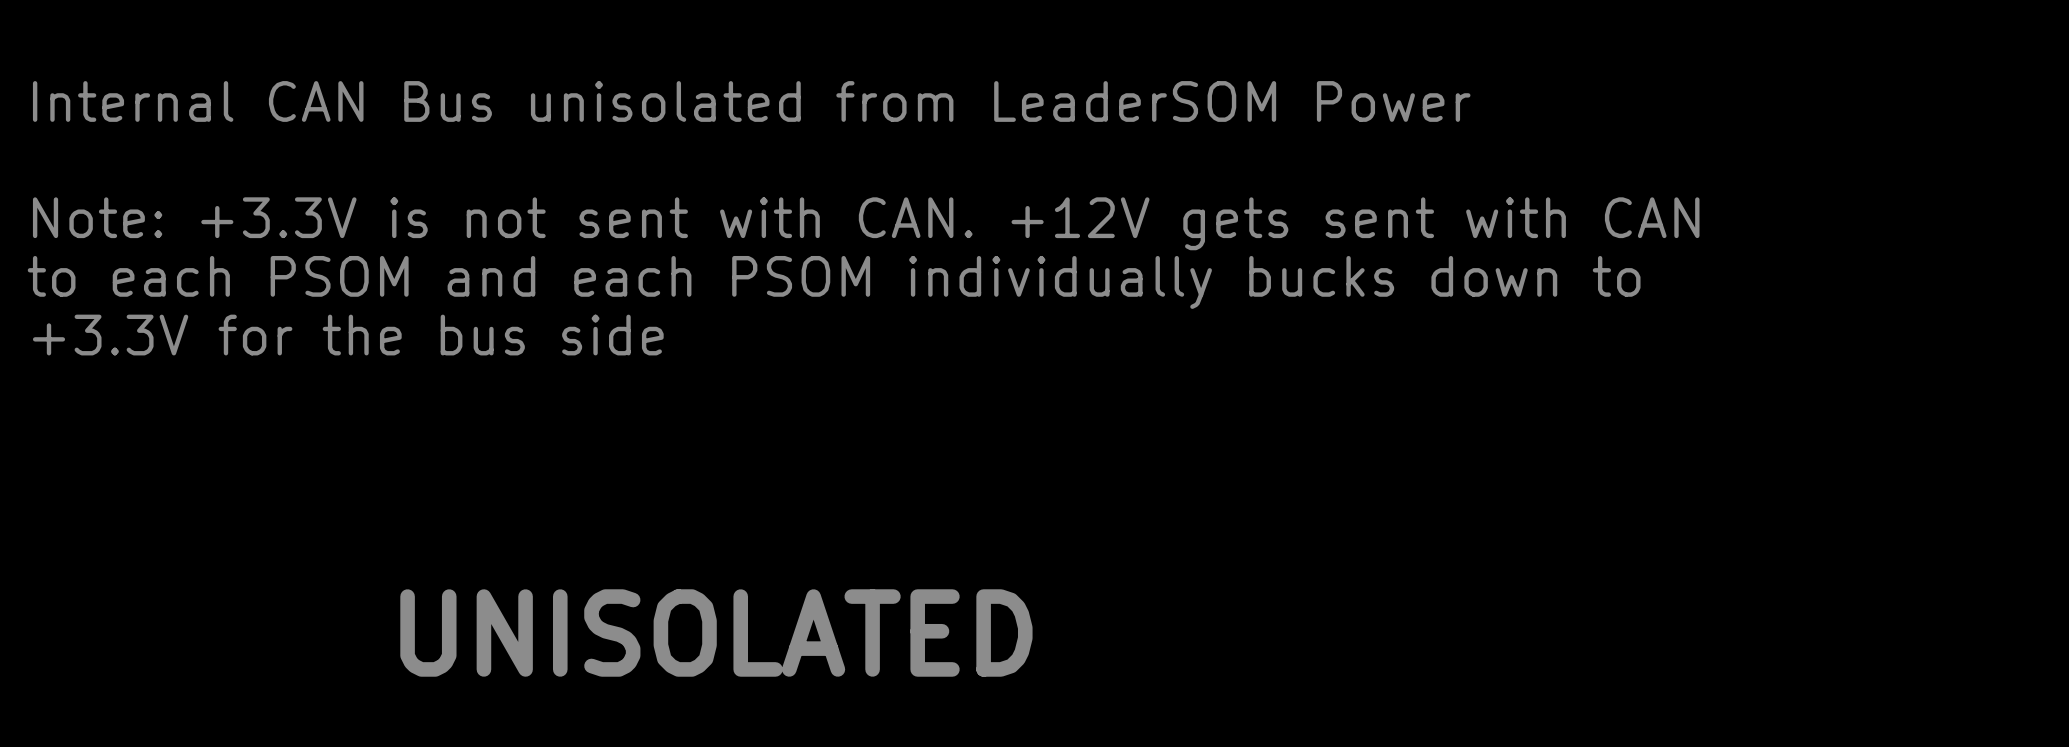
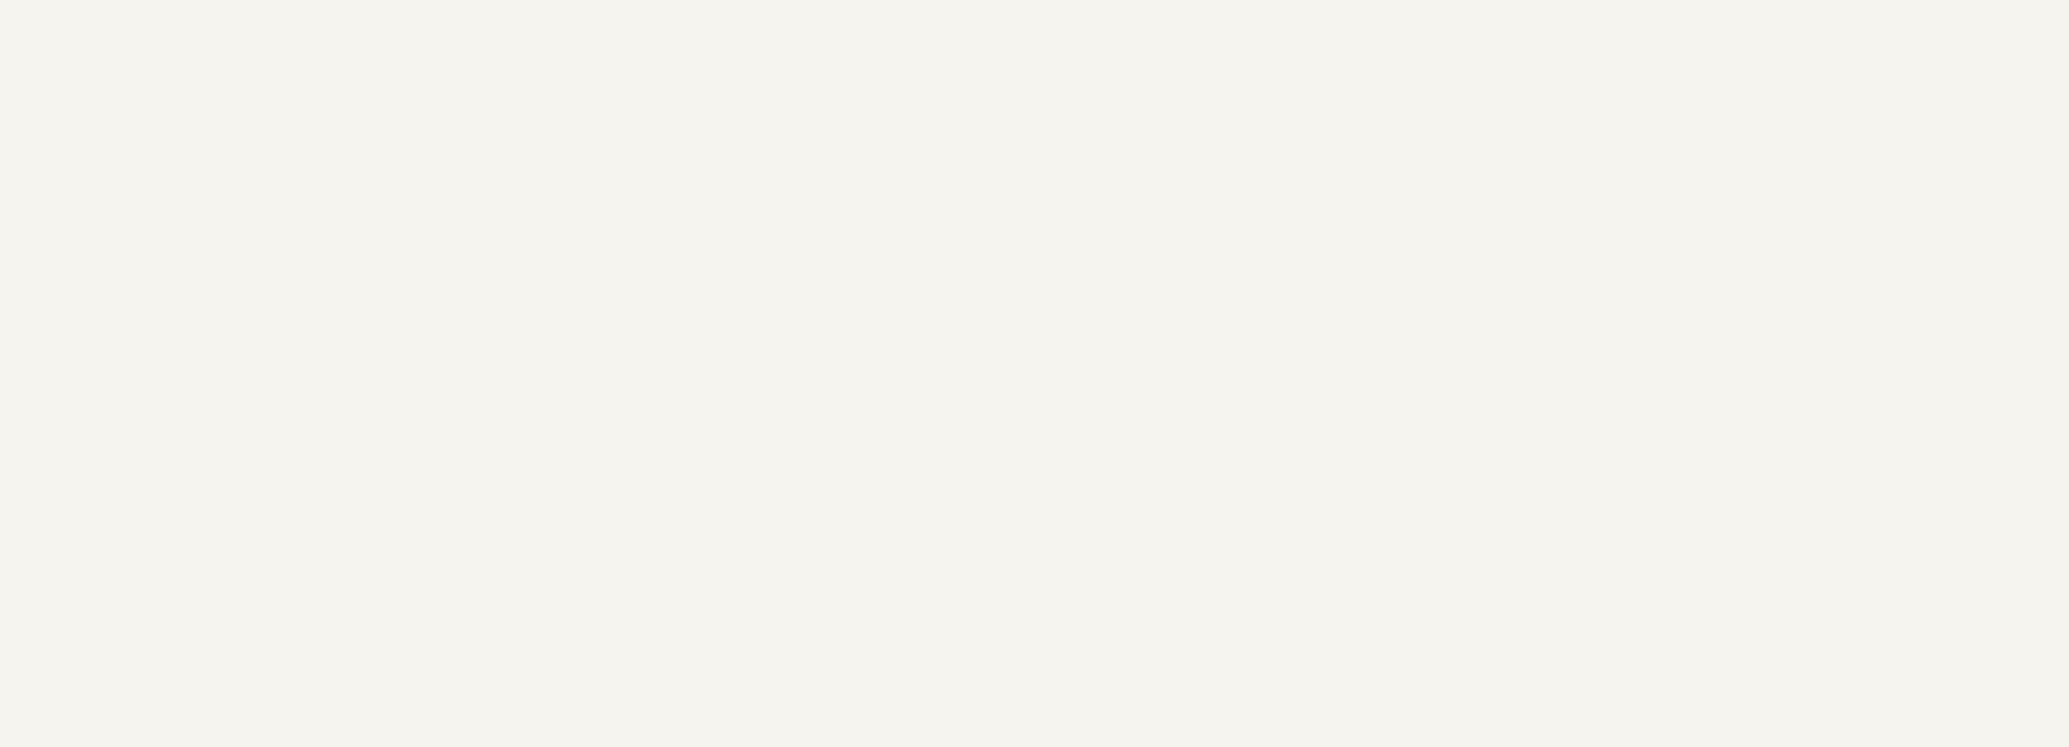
text: Internal CAN Bus unisolated from LeaderSOM Power (751, 101) -> none
text: Note: +3.3V is not sent with CAN. +12V gets sent with CAN (866, 223) -> none
text: to each PSOM and each PSOM individually bucks down to (834, 282) -> none
text: +3.3V for the bus side (348, 335) -> none
text: UNISOLATED (716, 632) -> none

